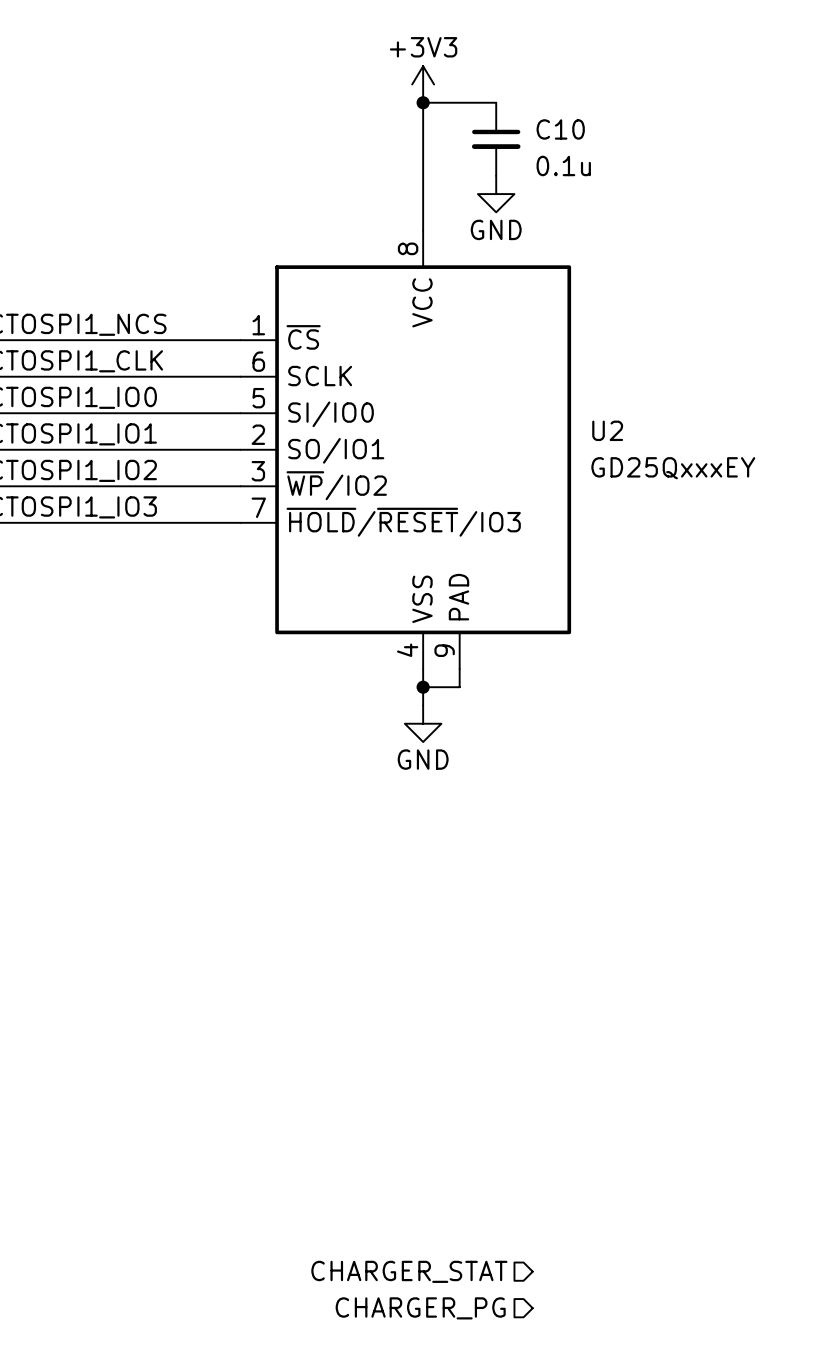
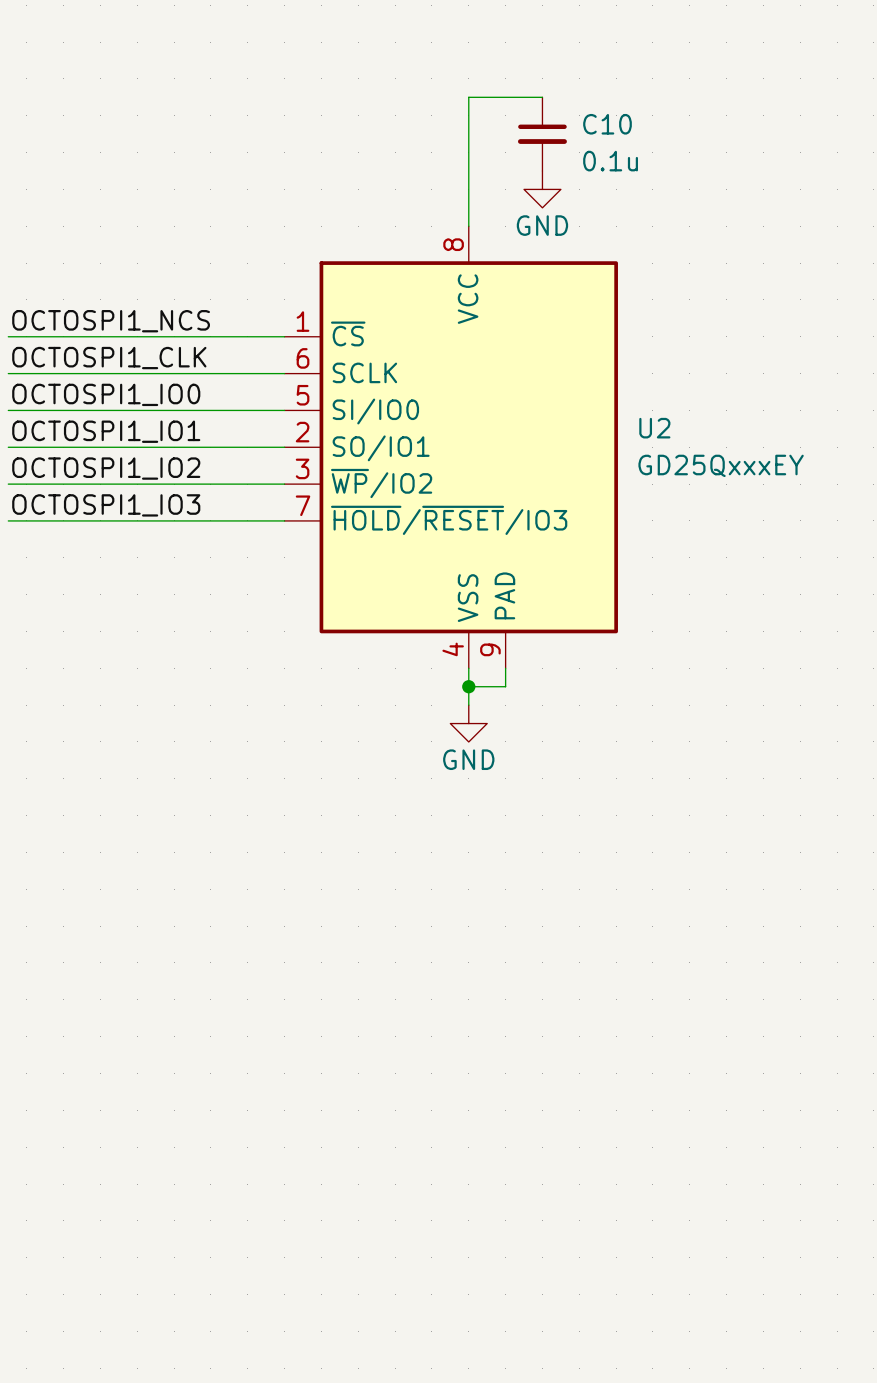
power symbol: +3V3 (423, 84) -> none
junction: (423, 102) -> none
hierarchical label: CHARGER_STAT (409, 1271) -> none
hierarchical label: CHARGER_PG (420, 1308) -> none

